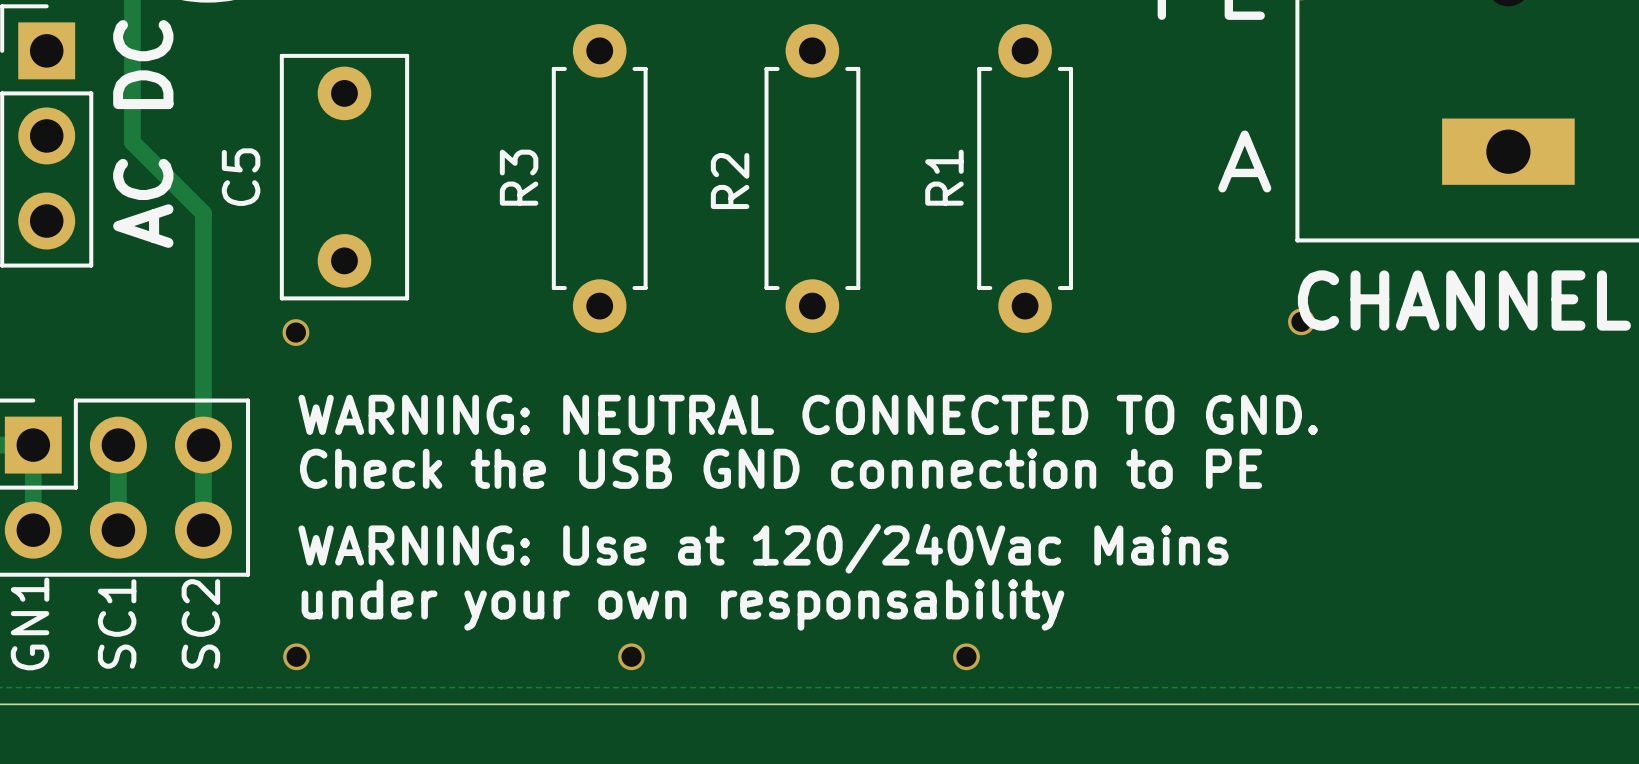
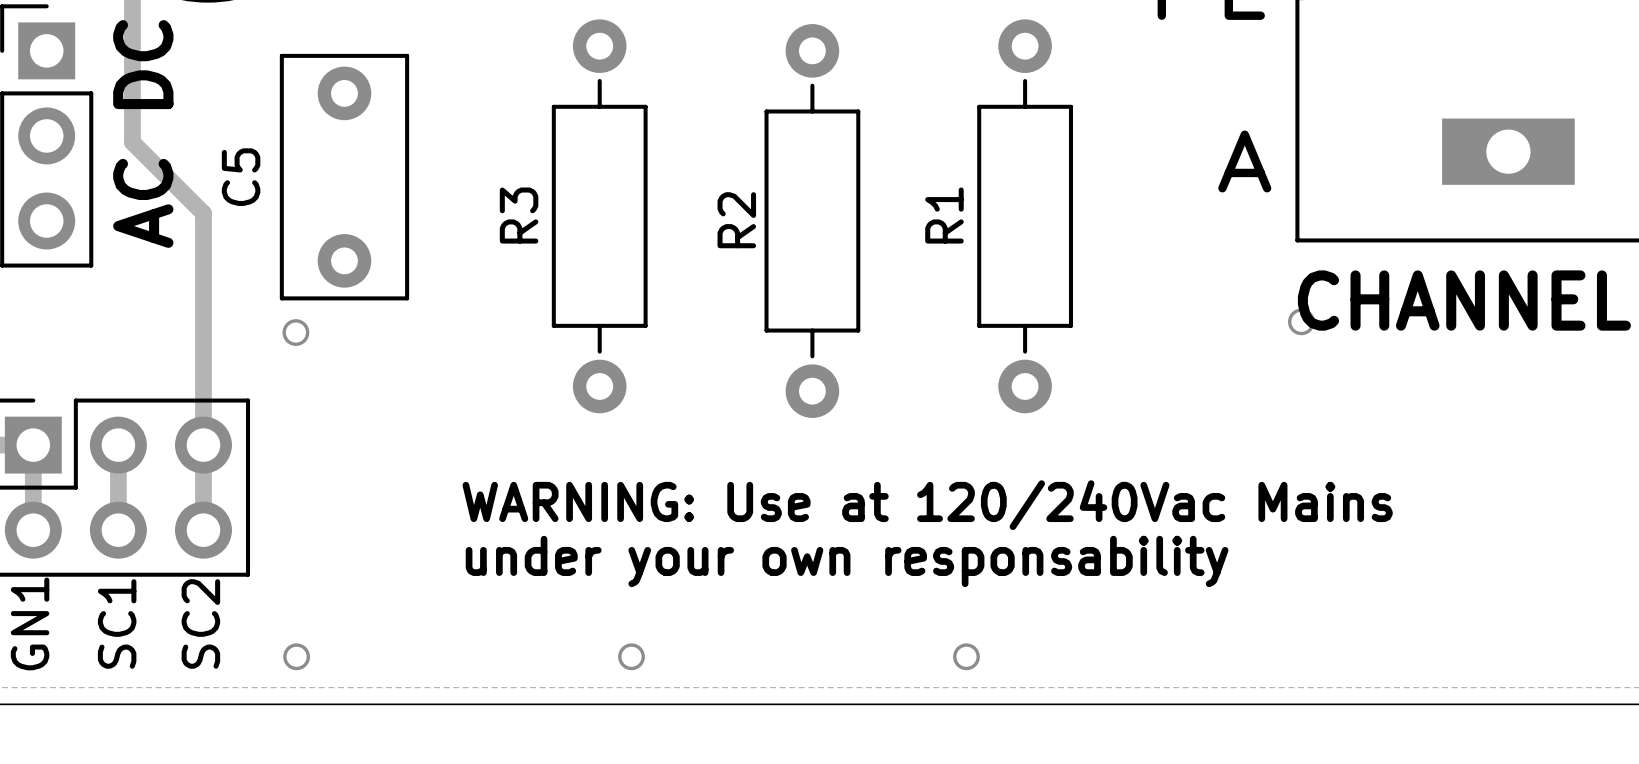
R3 footprint: [551, 24, 648, 333] -> [551, 19, 648, 414]
R2 footprint: [764, 24, 861, 333] -> [764, 24, 861, 418]
R1 footprint: [977, 24, 1073, 333] -> [977, 19, 1073, 414]
text: WARNING: NEUTRAL CONNECTED TO GND. (808, 414) -> none
text: Check the USB GND connection to PE (781, 468) -> none
text position: WARNING: Use at 120/240Vac Mains (763, 548) -> WARNING: Use at 120/240Vac Mains (927, 505)
text position: under your own responsability (682, 605) -> under your own responsability (847, 561)

